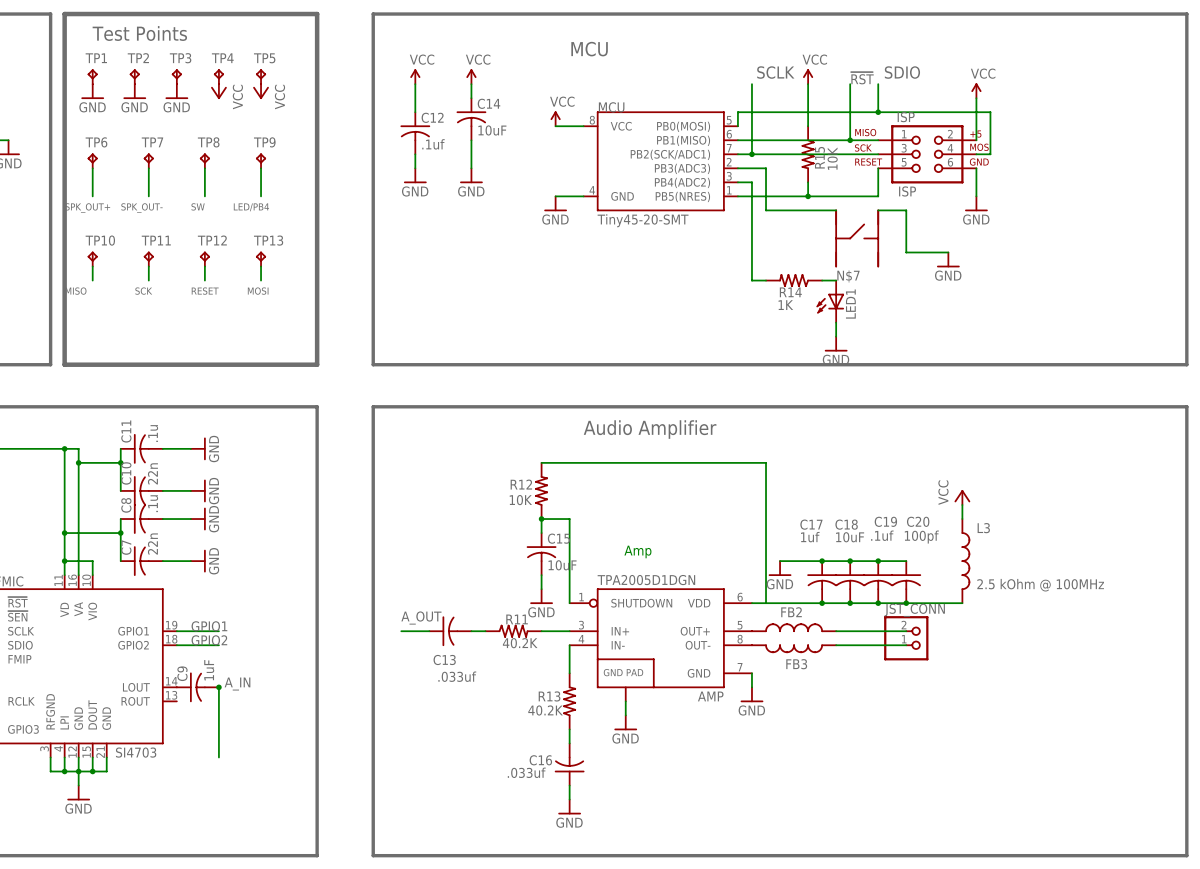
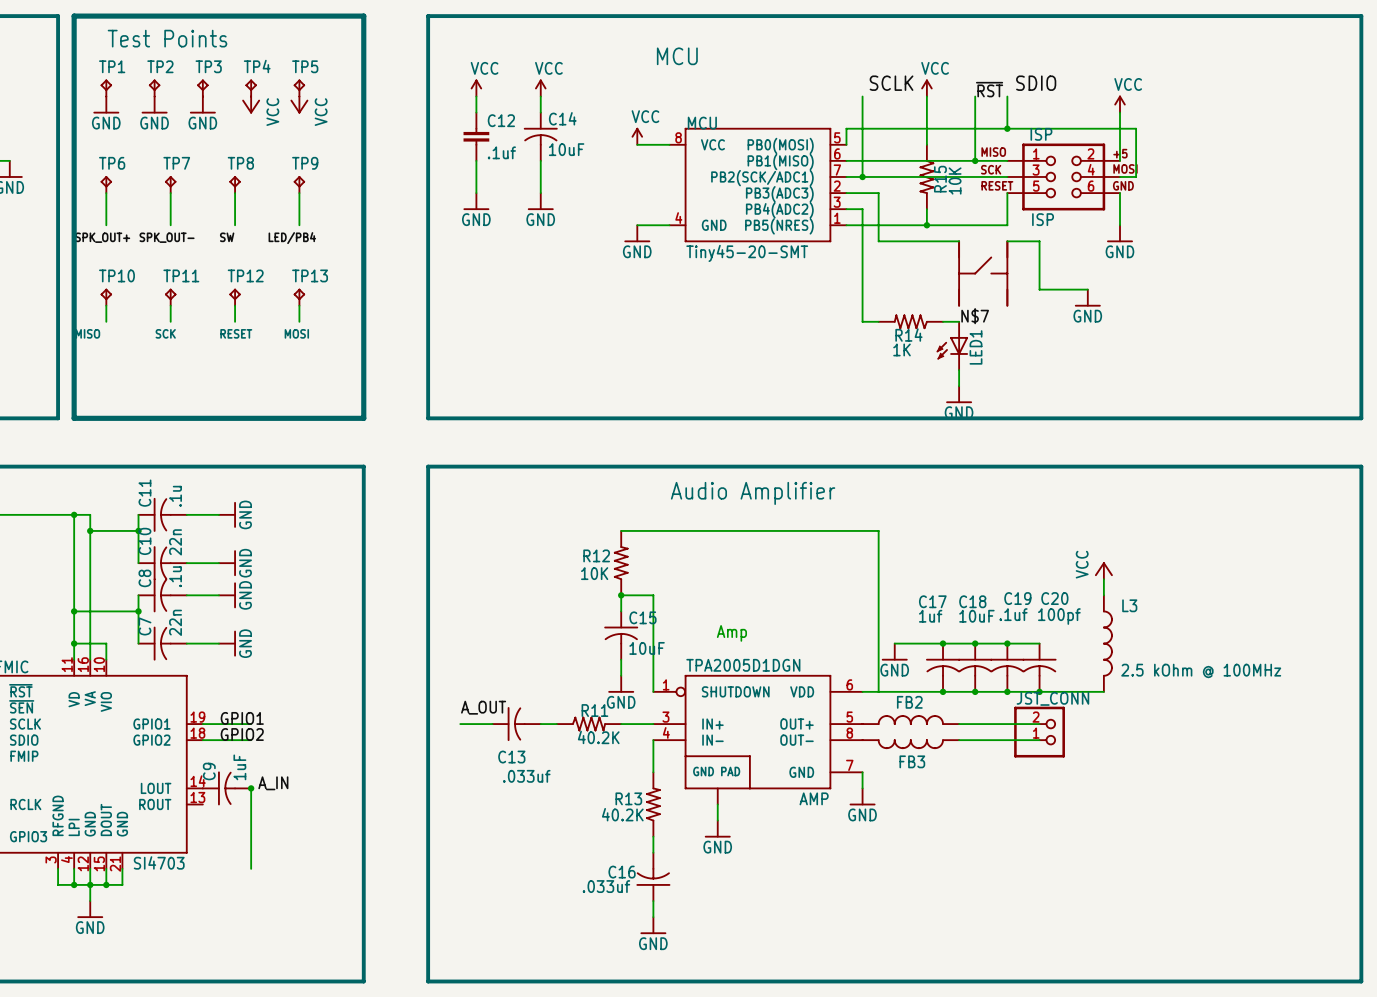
C12 symbol: [400, 112, 431, 155] -> [463, 112, 490, 161]

